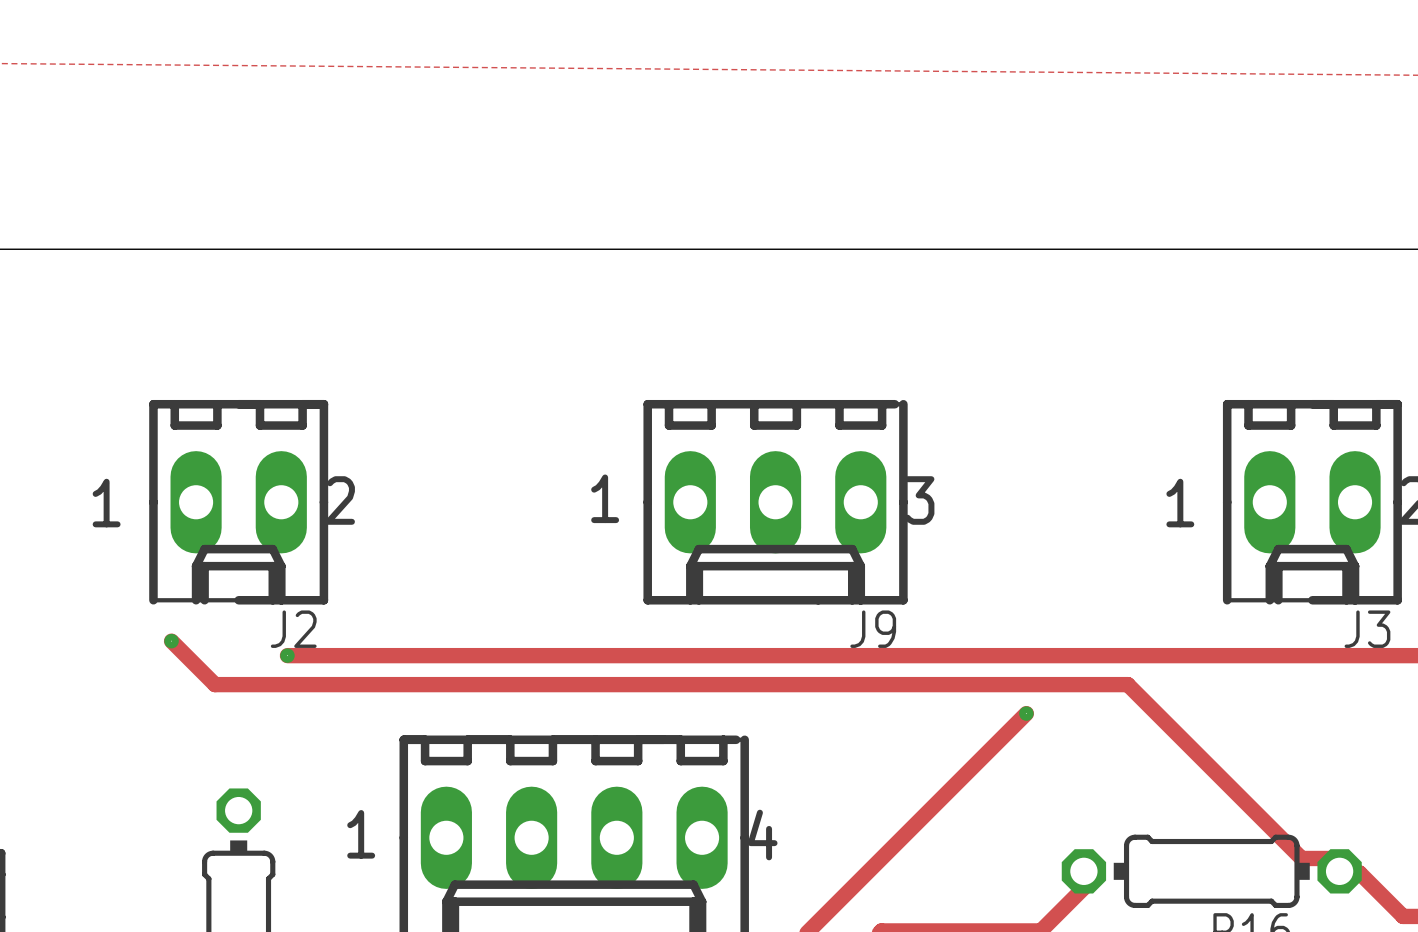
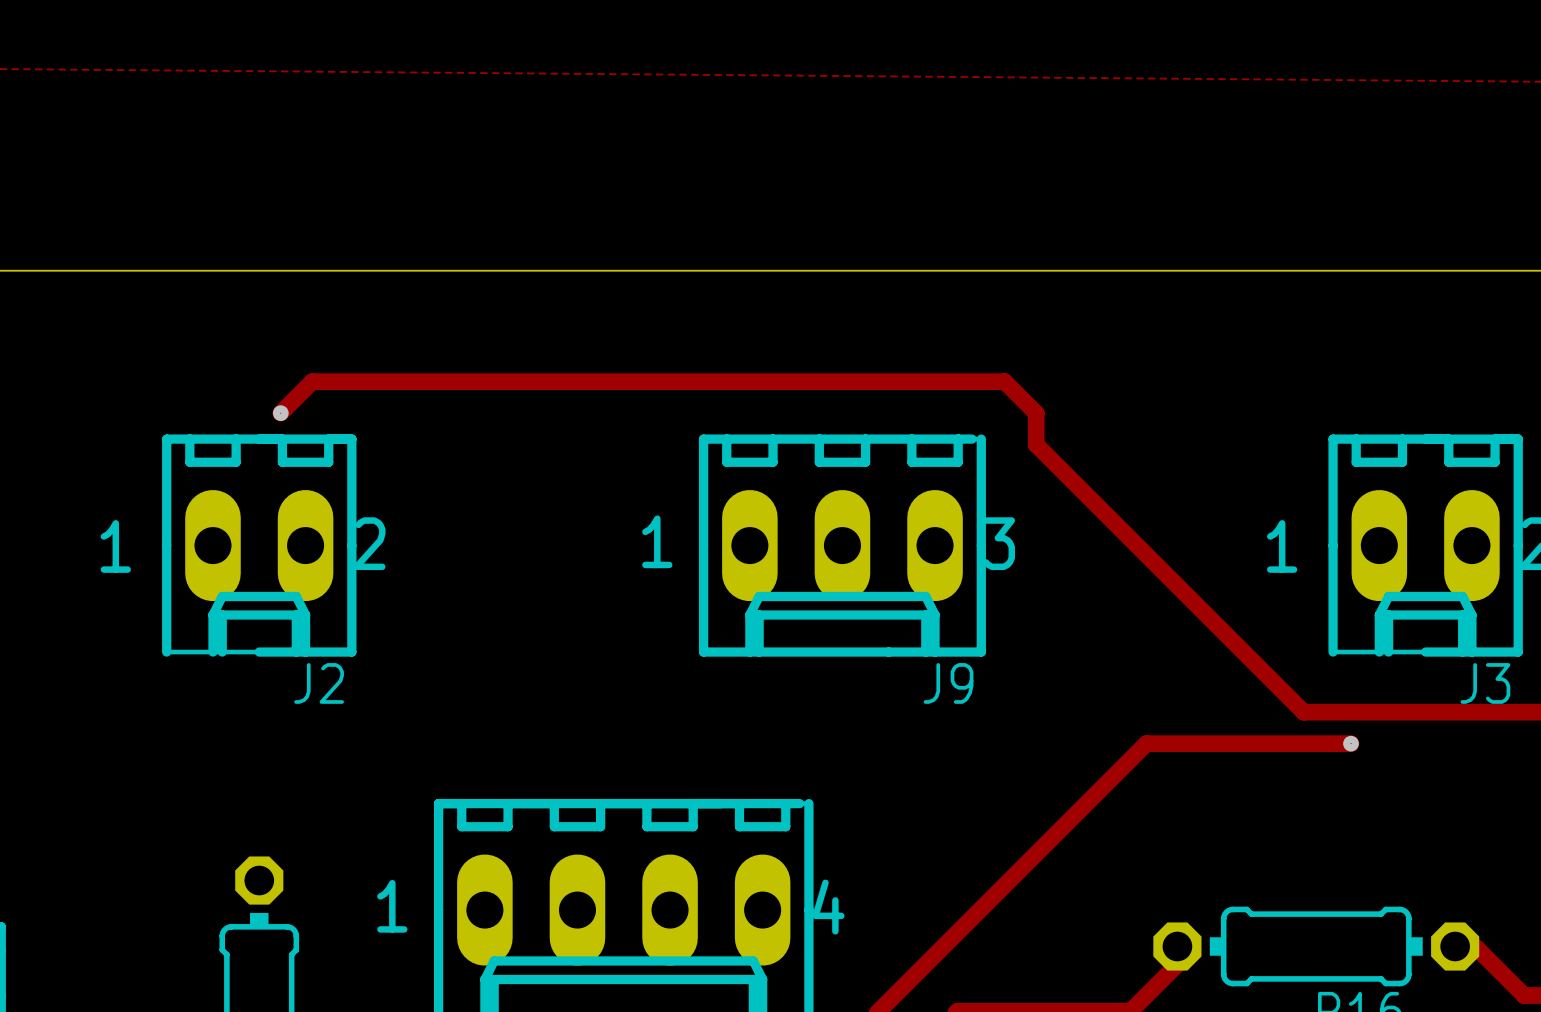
via: none -> (280, 413)
track: (171, 641) (215, 684) (1055, 684) -> (1114, 775) (1146, 743)
via: (171, 641) -> none
track: (287, 655) (1200, 655) -> (280, 413) (312, 381) (1004, 381) (1036, 413) (1036, 444) (1303, 712)
via: (287, 655) -> none
track: (1127, 684) (1301, 858) (1330, 858) (1339, 871) -> (1225, 743) (1351, 743)
via: none -> (1351, 743)
via: (1026, 713) -> none

